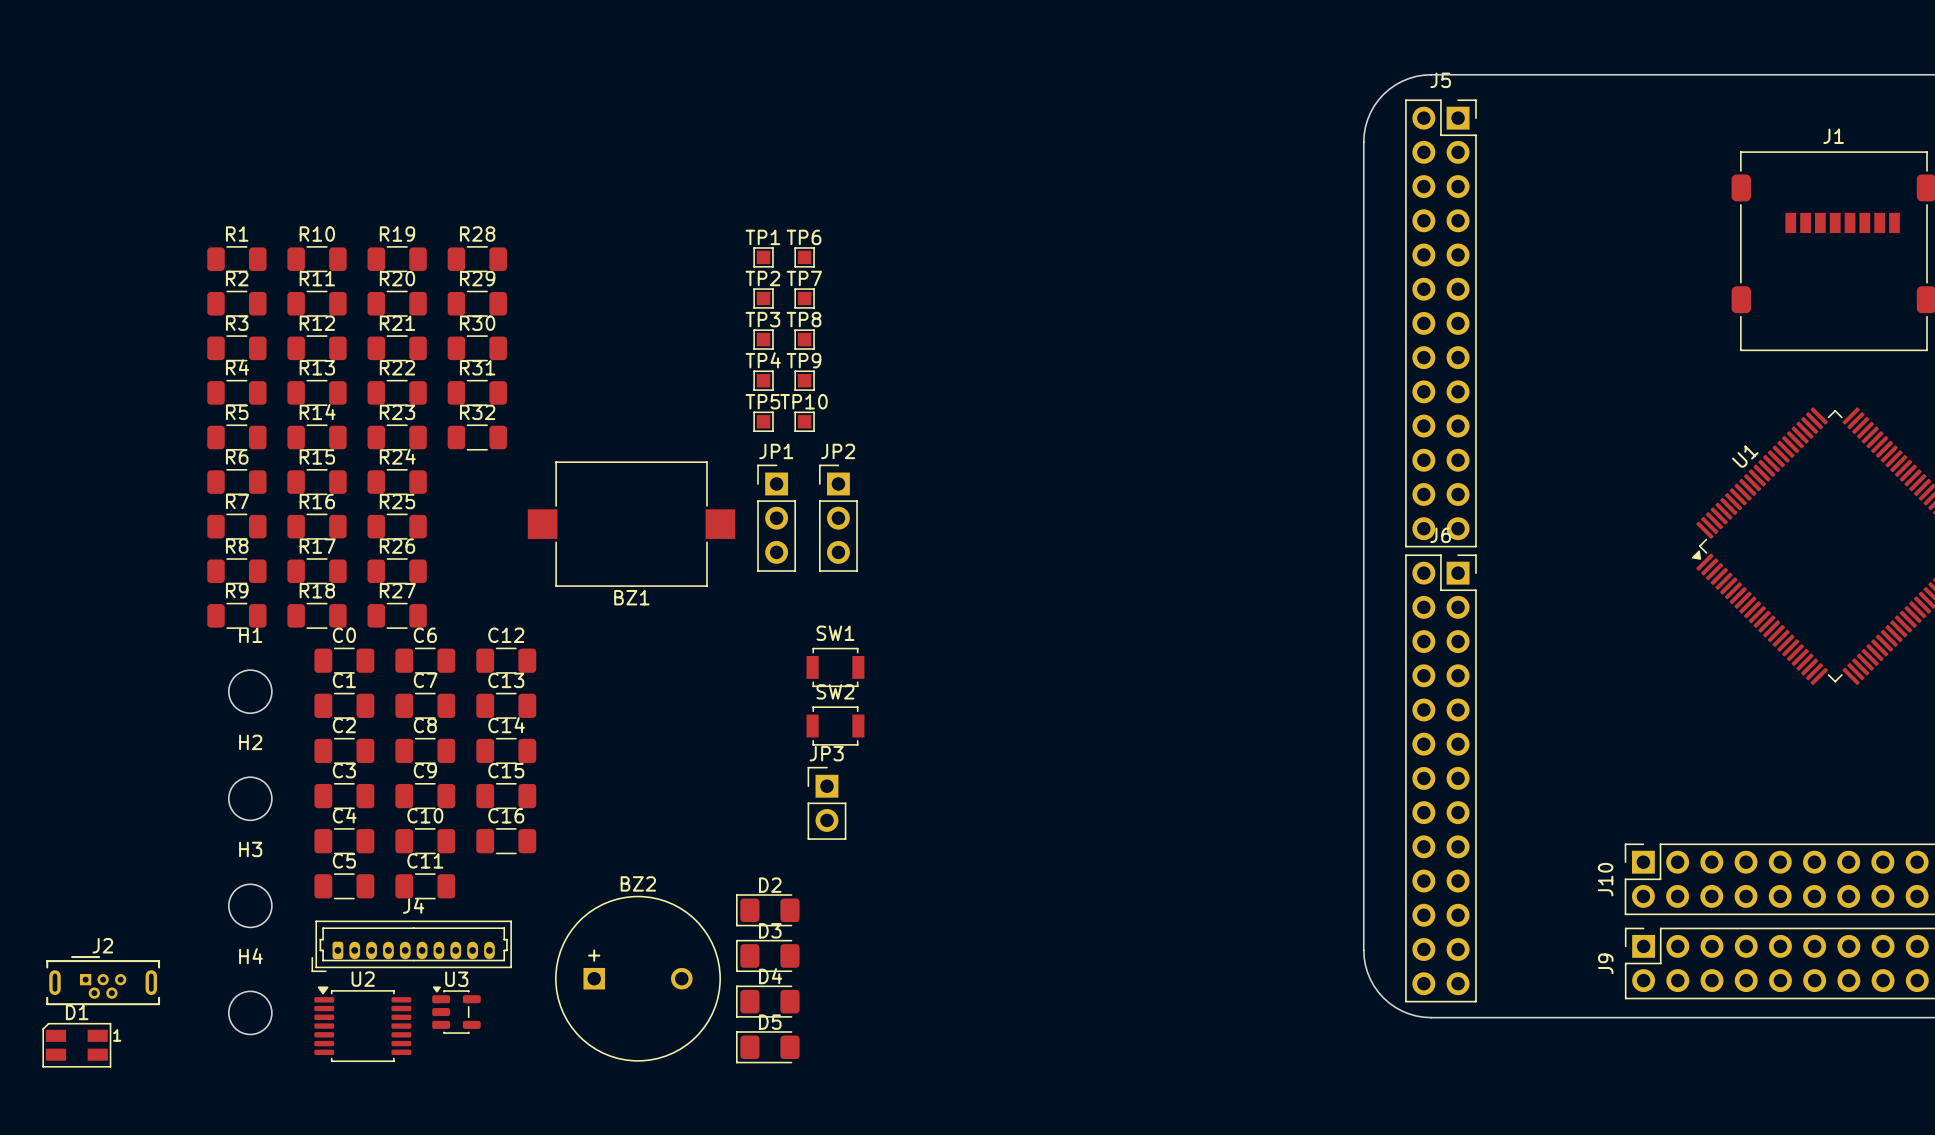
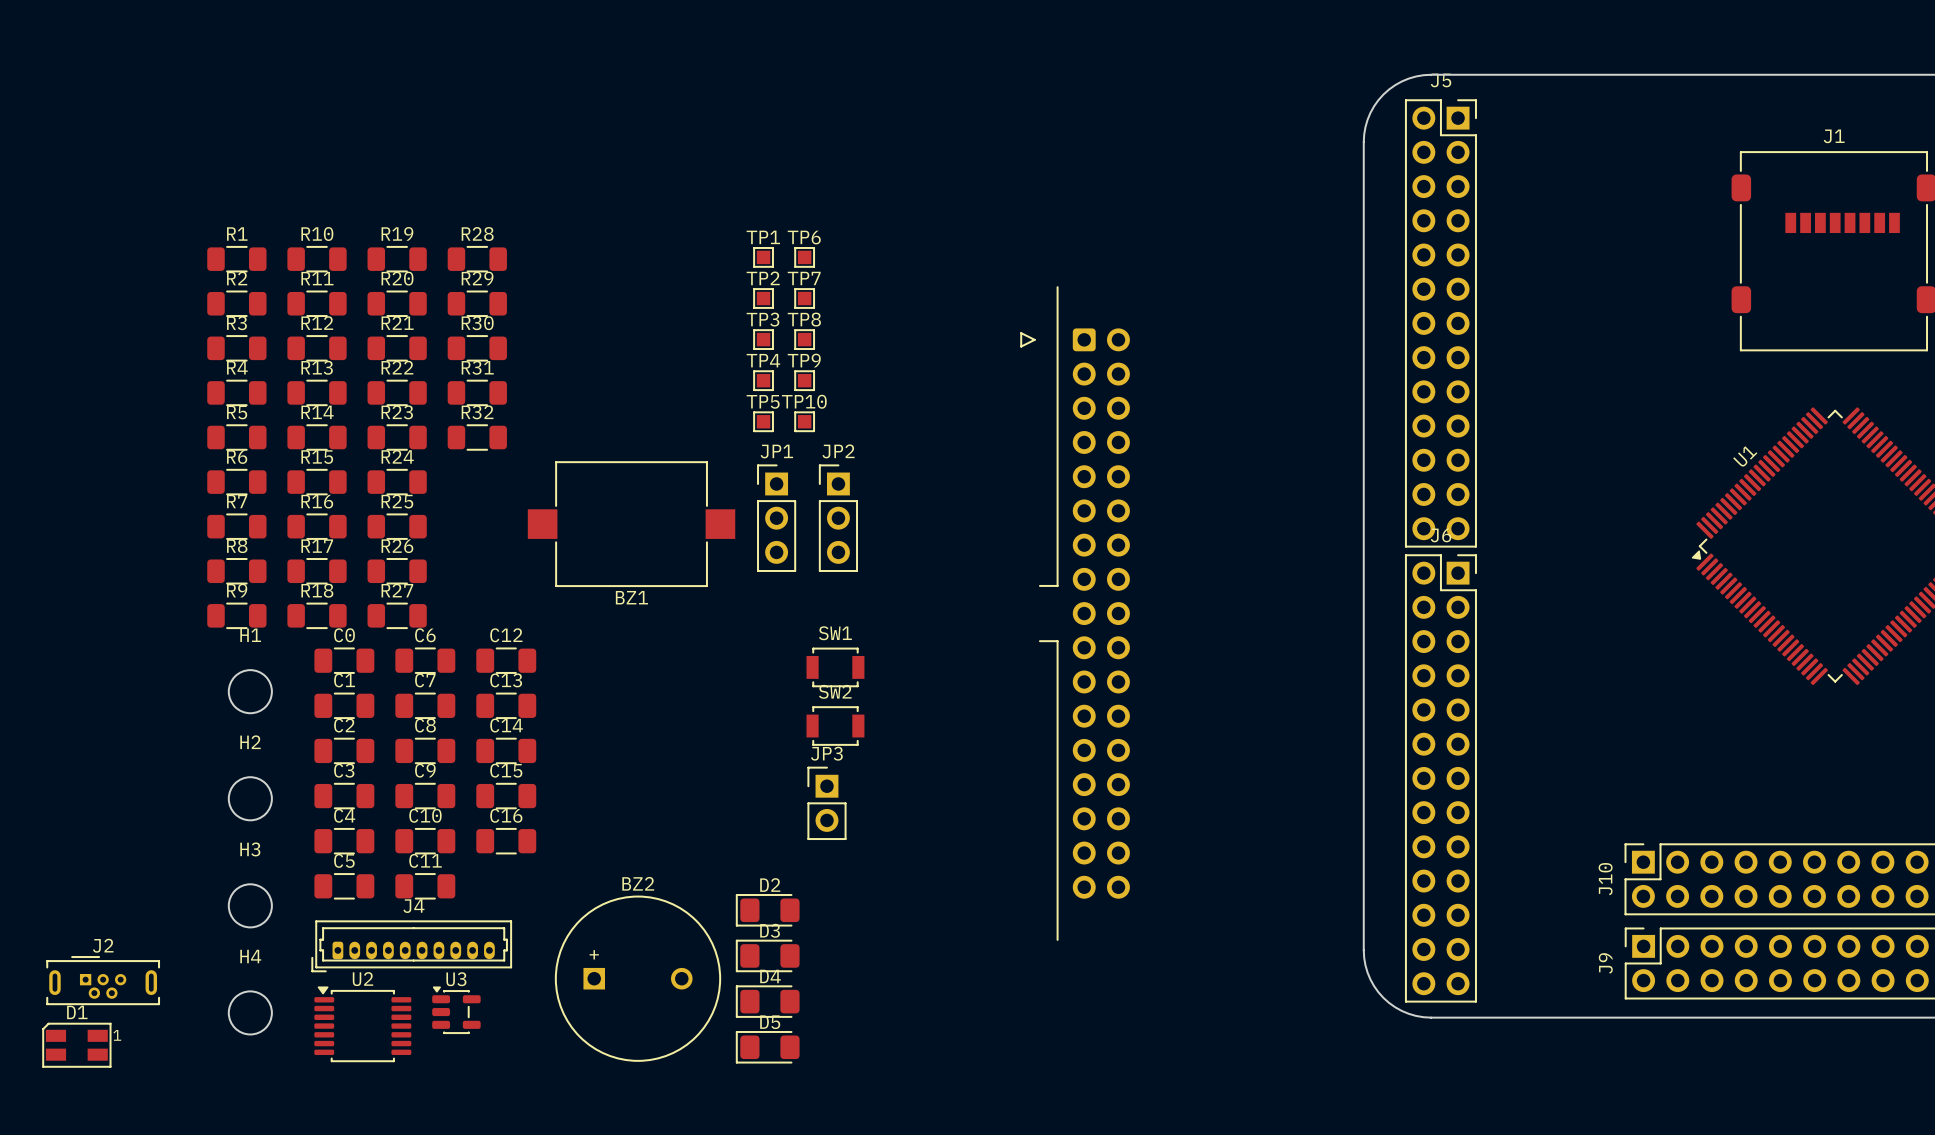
part: none -> (1075, 613)

